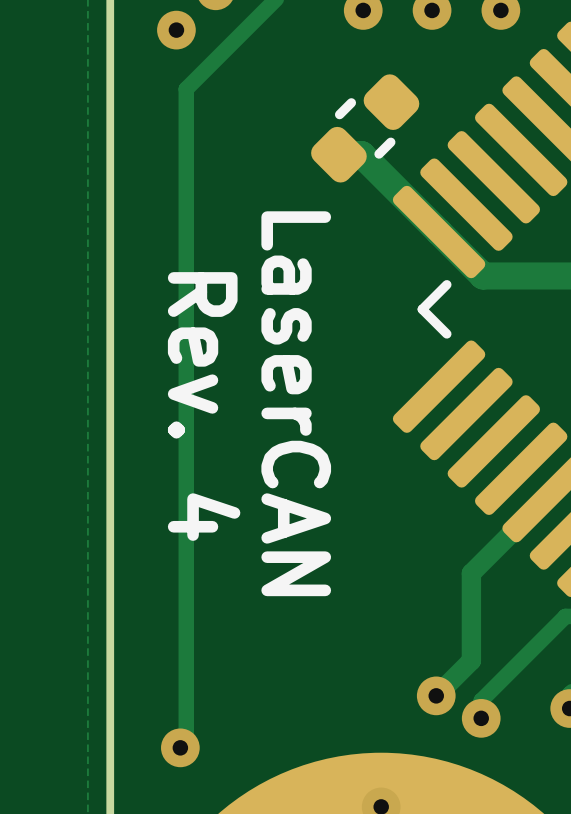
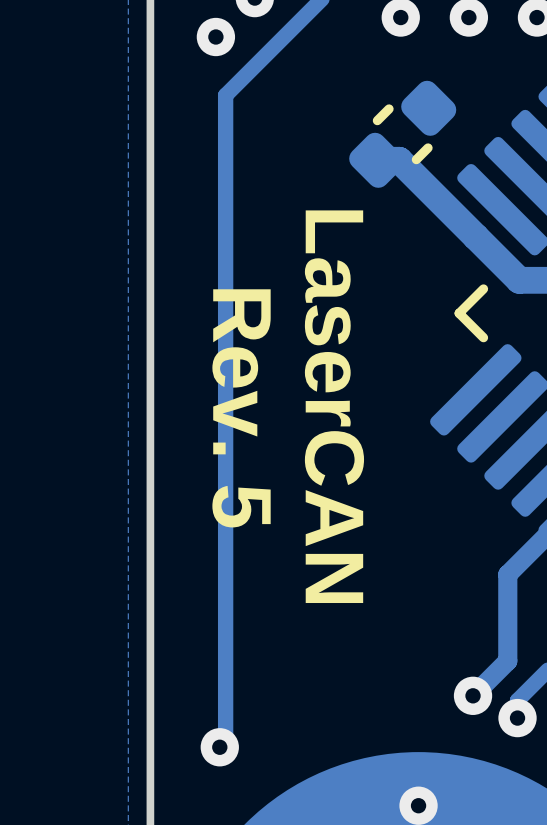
text: Rev. 4 (204, 406) -> Rev. 5 (241, 408)

